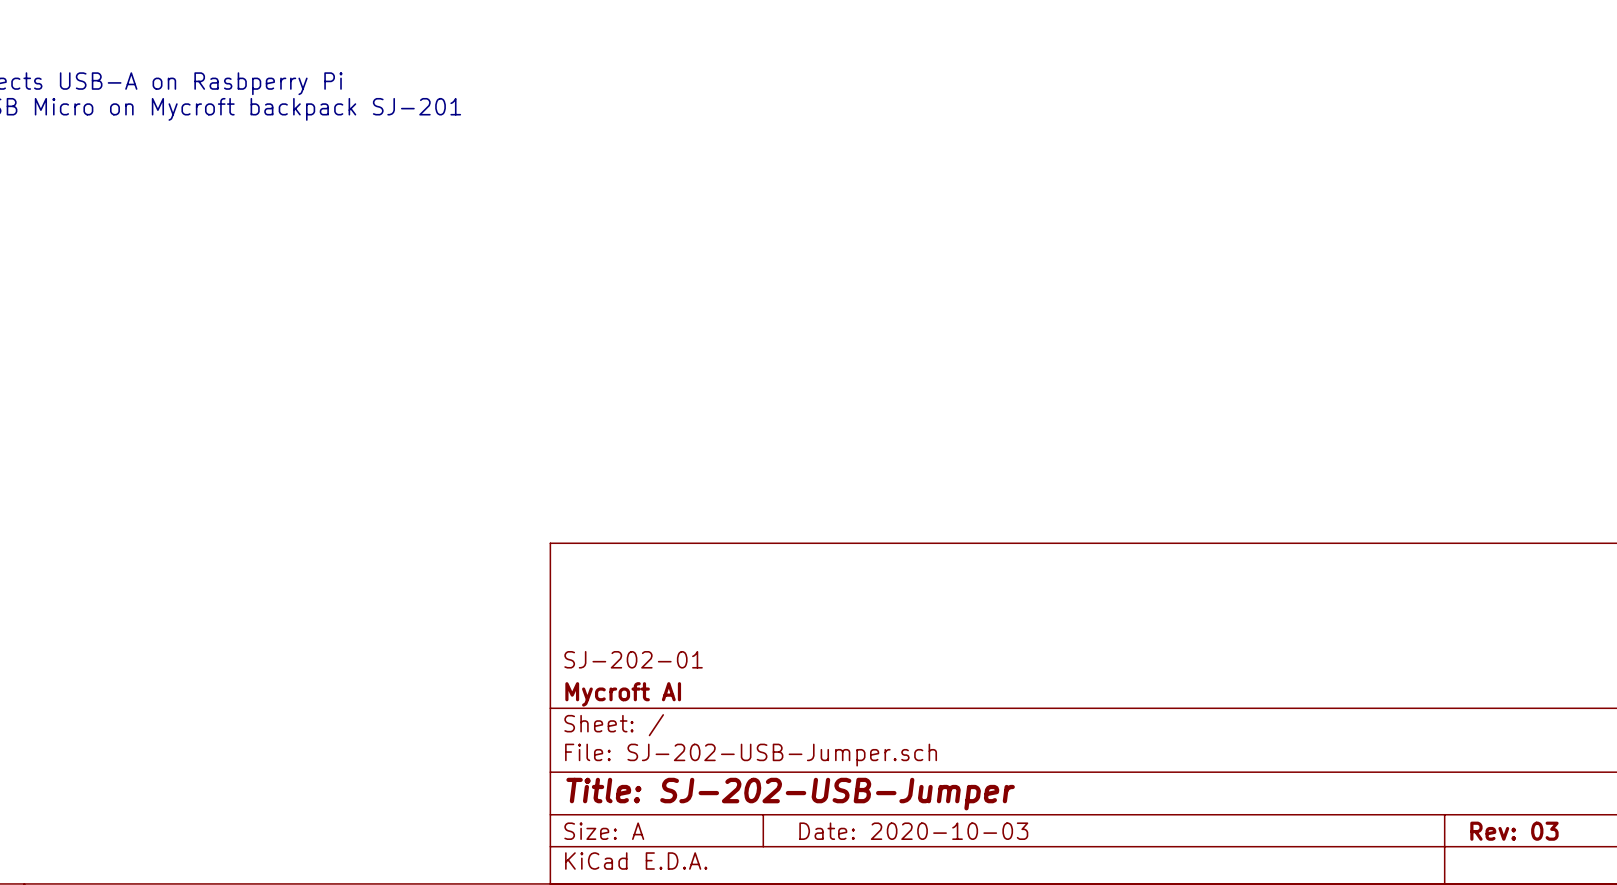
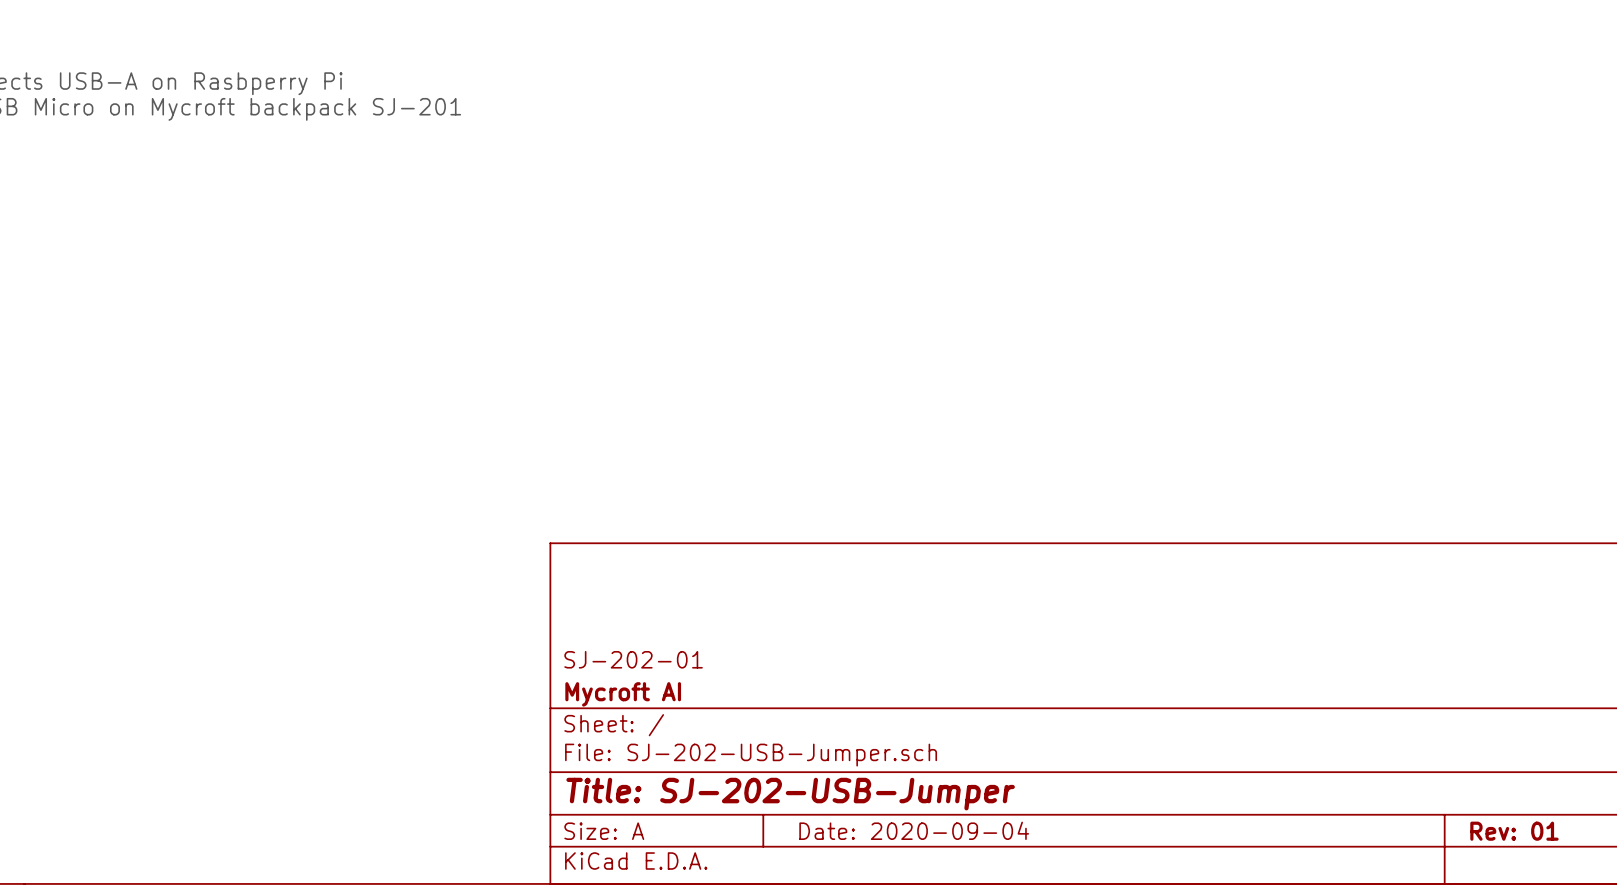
title block: Date: 2020-10-03 (913, 831) -> Date: 2020-09-04 (914, 830)
title block: Rev: 03 (1514, 831) -> Rev: 01 (1514, 831)

